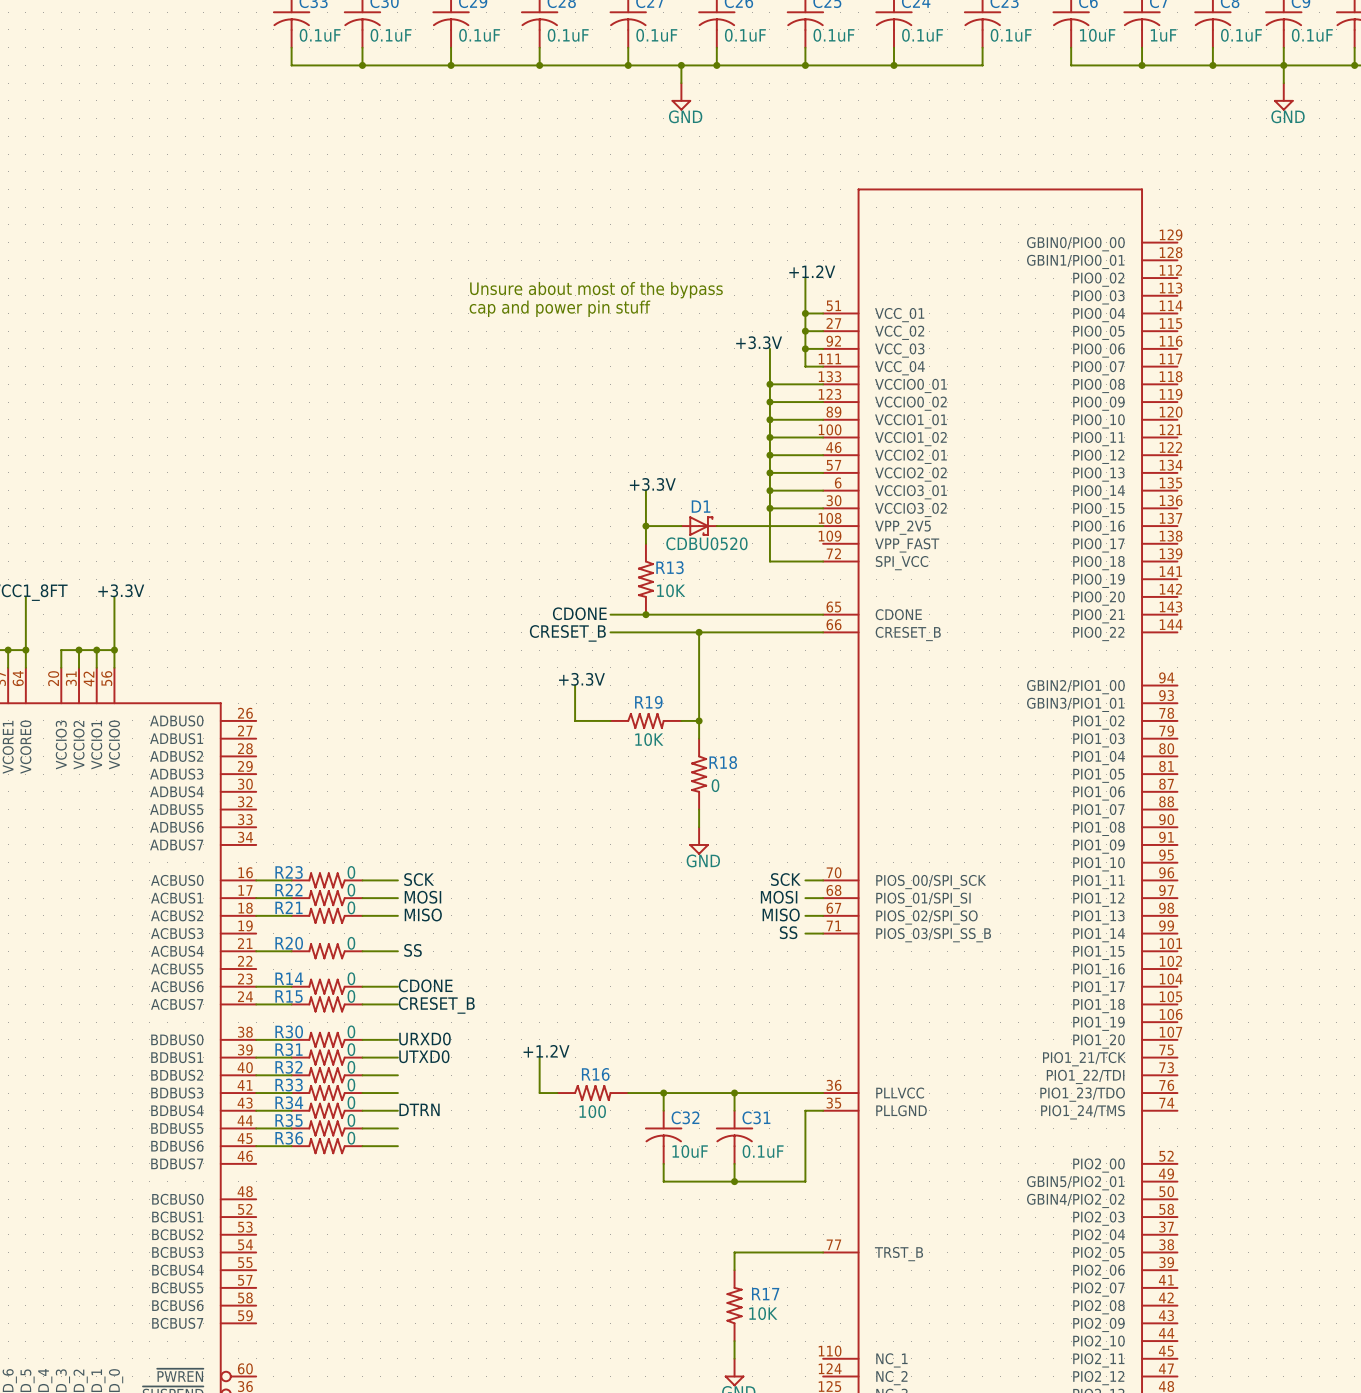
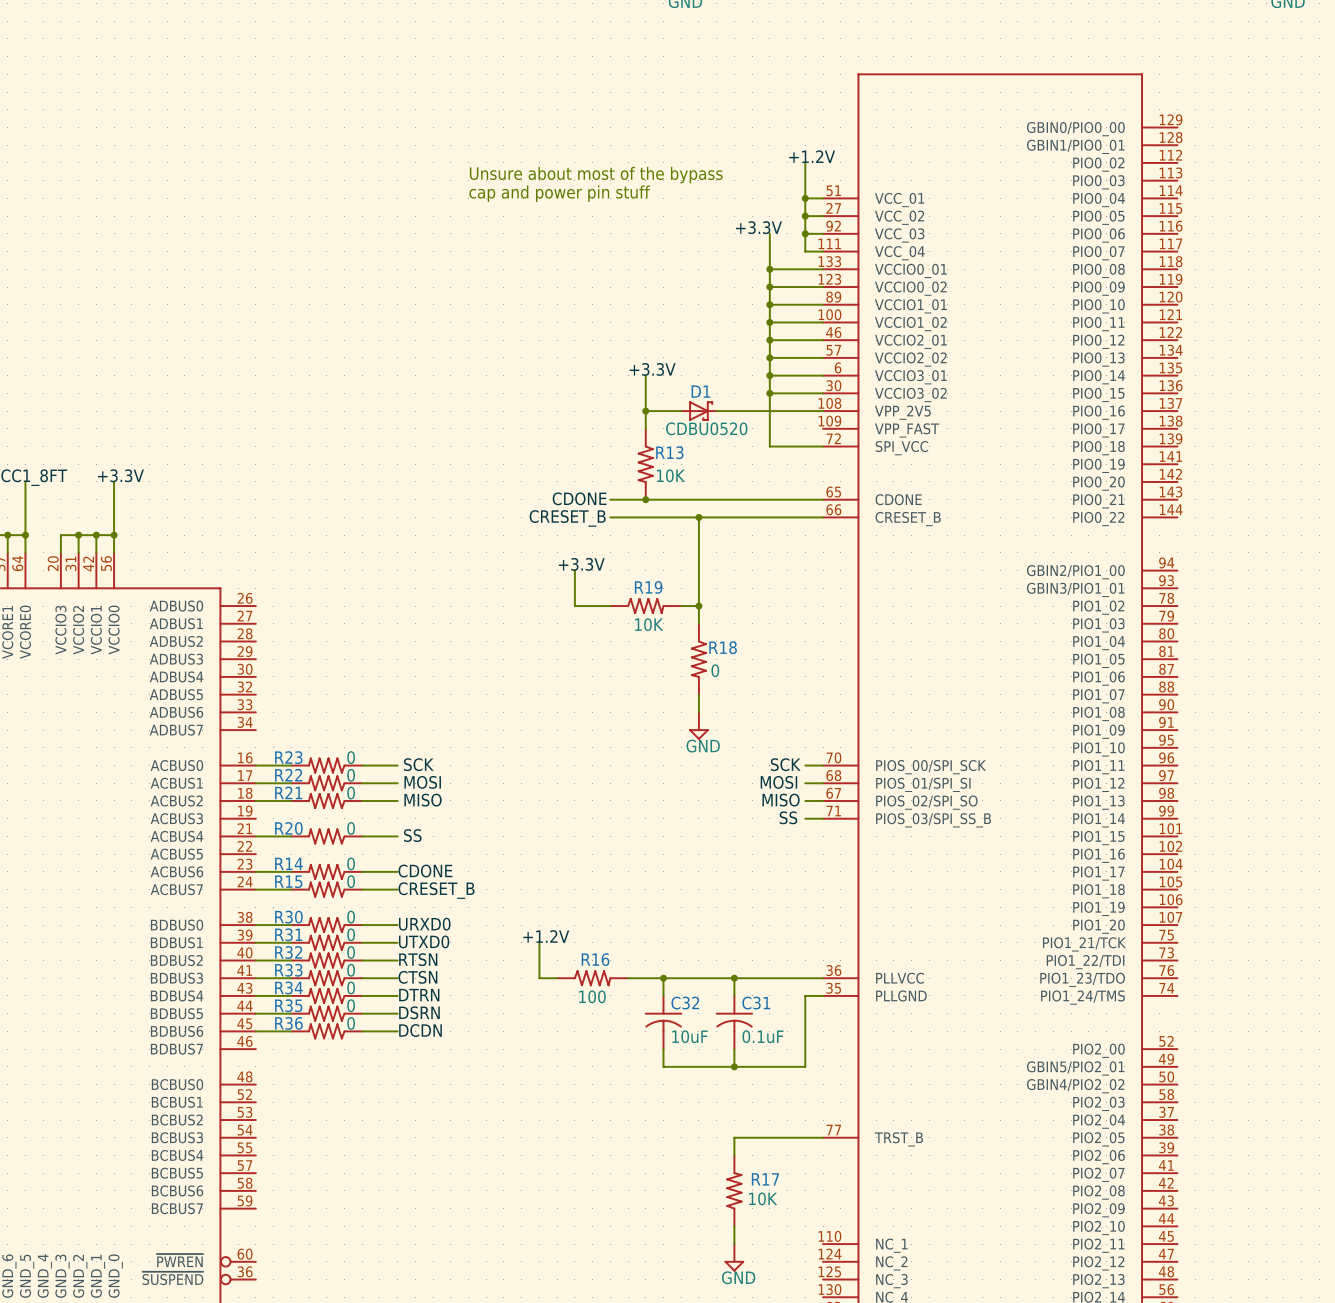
label: none -> RTSN (418, 959)
label: none -> CTSN (417, 977)
label: none -> DSRN (419, 1012)
label: none -> DCDN (420, 1030)

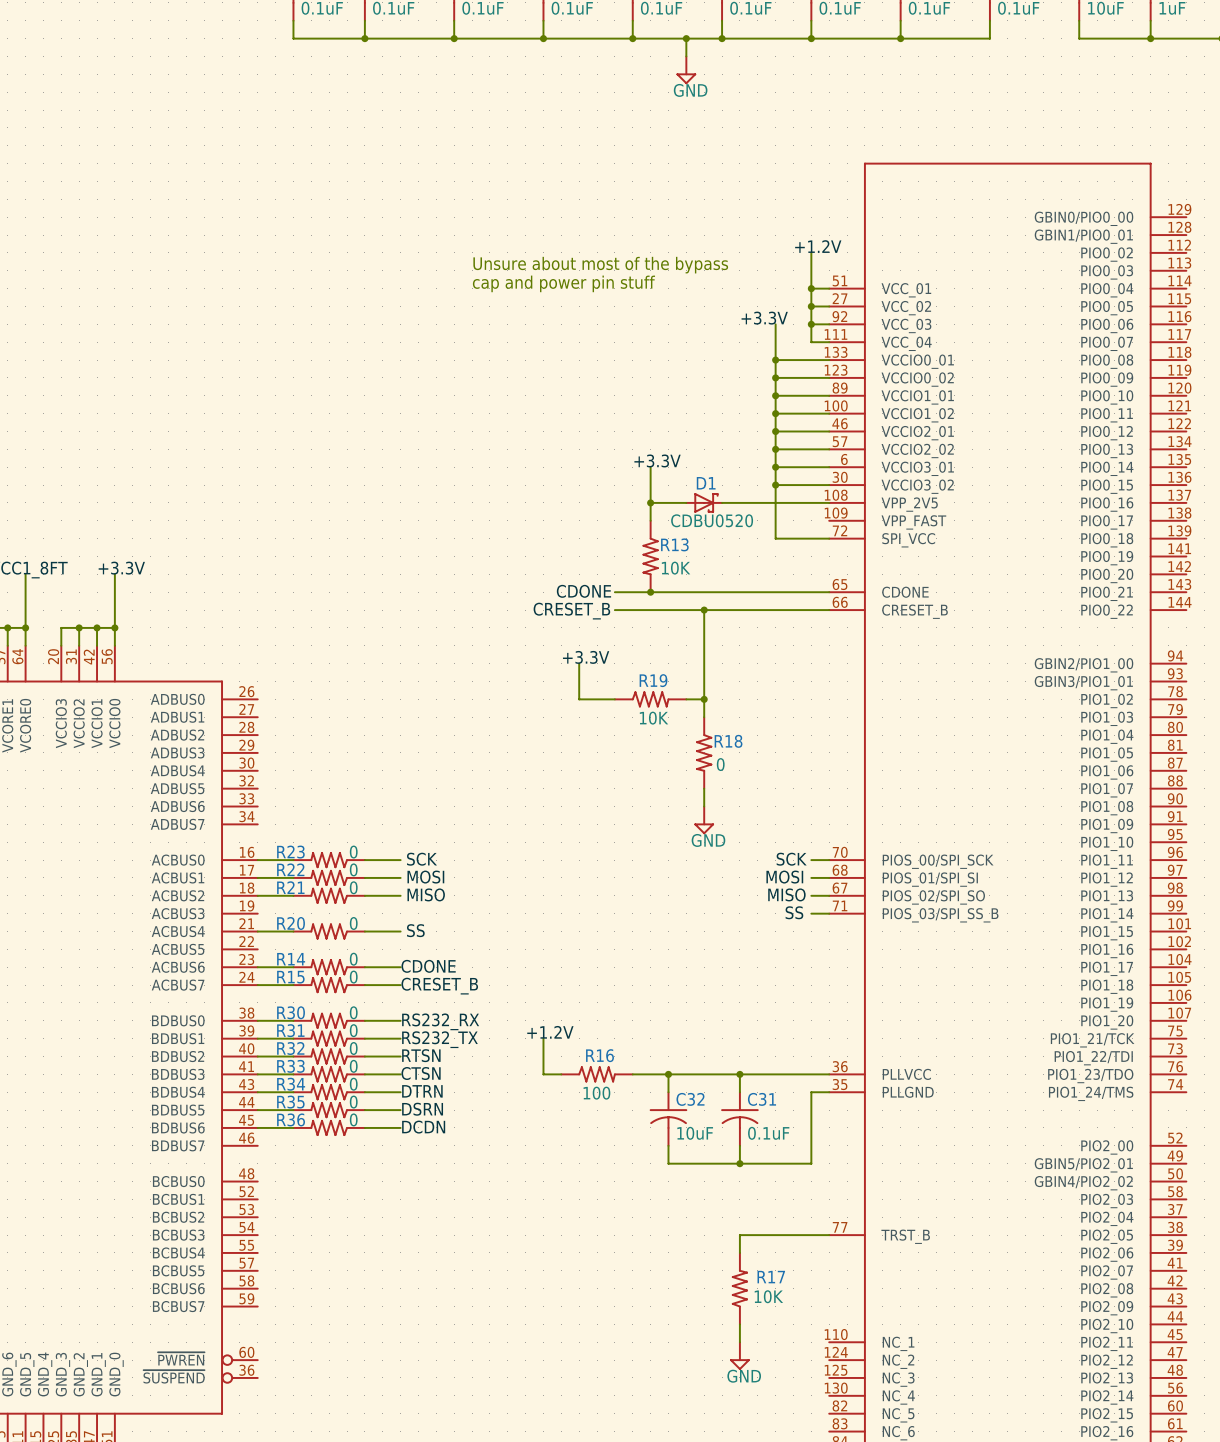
label: URXD0 (424, 924) -> RS232_RX (440, 1021)
label: UTXD0 (424, 941) -> RS232_TX (439, 1039)

